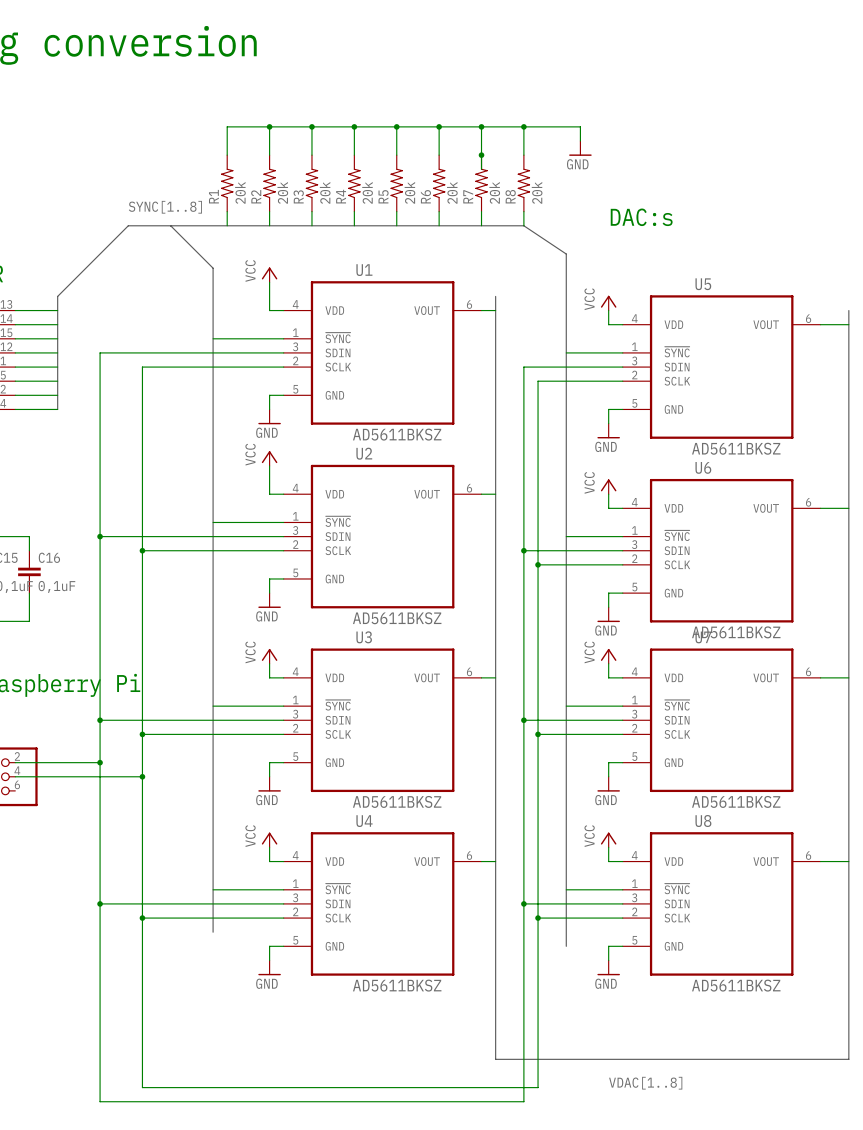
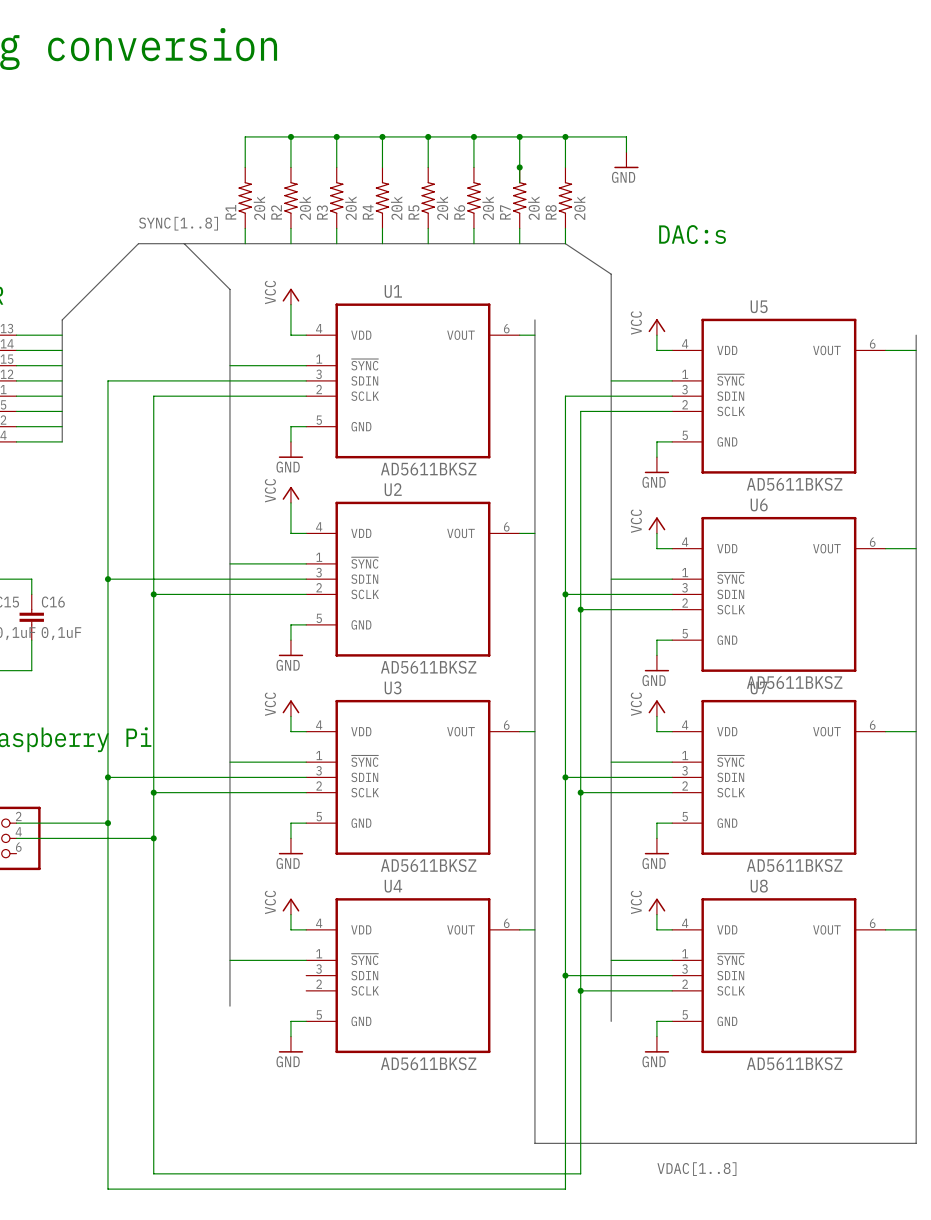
wire: (100, 903) (283, 903) -> none
junction: (100, 903) -> none
wire: (142, 918) (283, 918) -> none
junction: (142, 918) -> none

